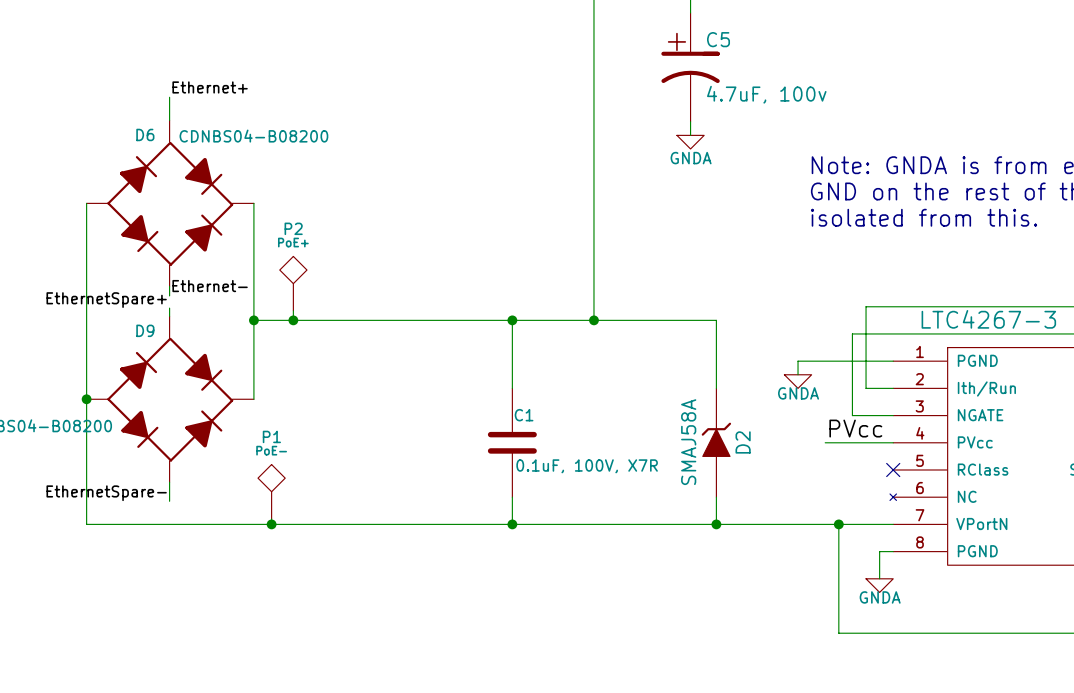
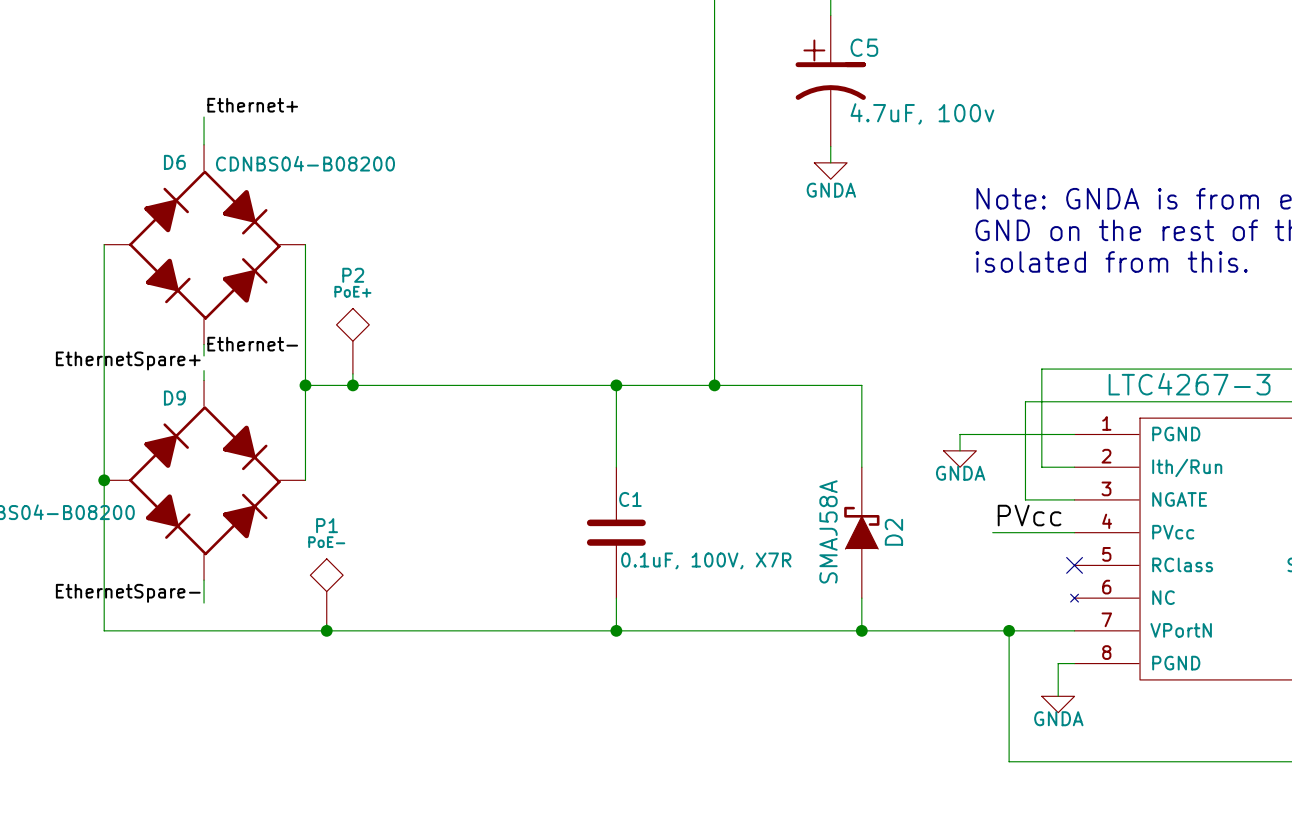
D2 symbol: [701, 388, 732, 498] -> [844, 467, 880, 599]

